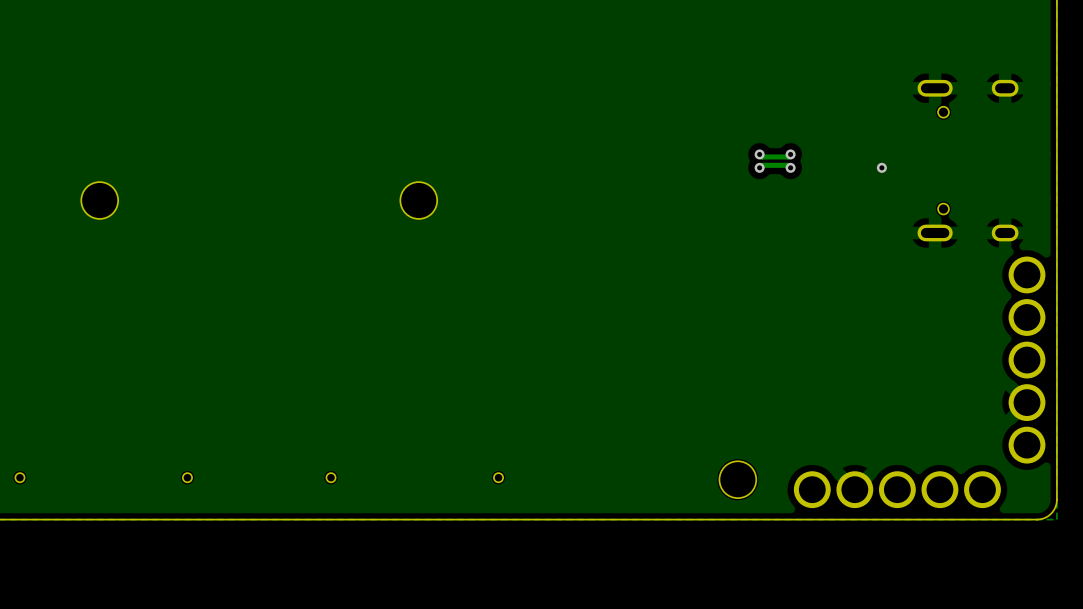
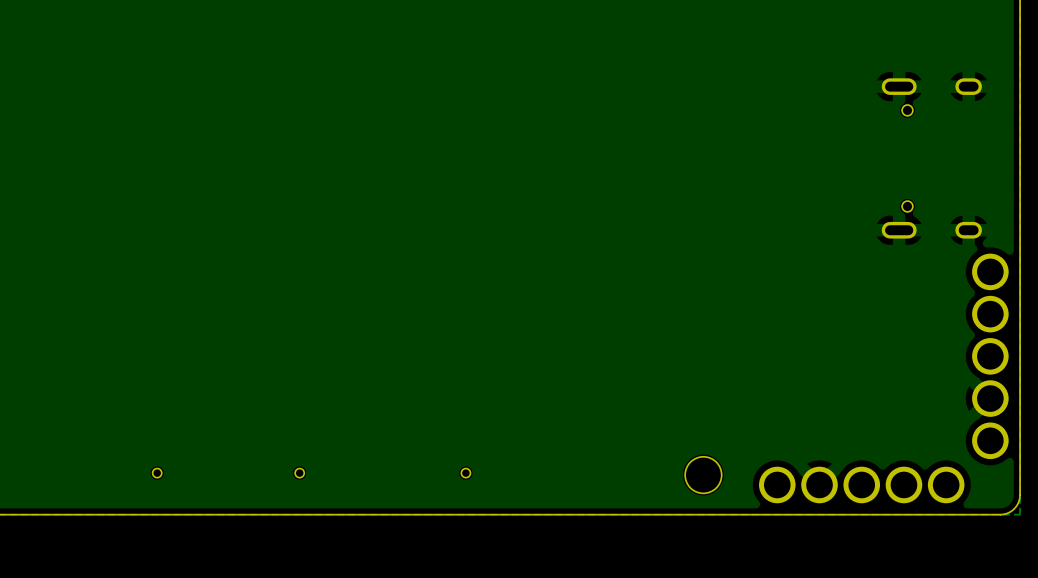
via: (759, 154) -> none
track: (790, 154) (788, 156) (762, 156) (759, 154) -> none
via: (790, 154) -> none
via: (759, 167) -> none
track: (790, 167) (788, 165) (762, 165) (759, 167) -> none
via: (790, 167) -> none
via: (881, 167) -> none
part: (99, 200) -> none
part: (418, 200) -> none

